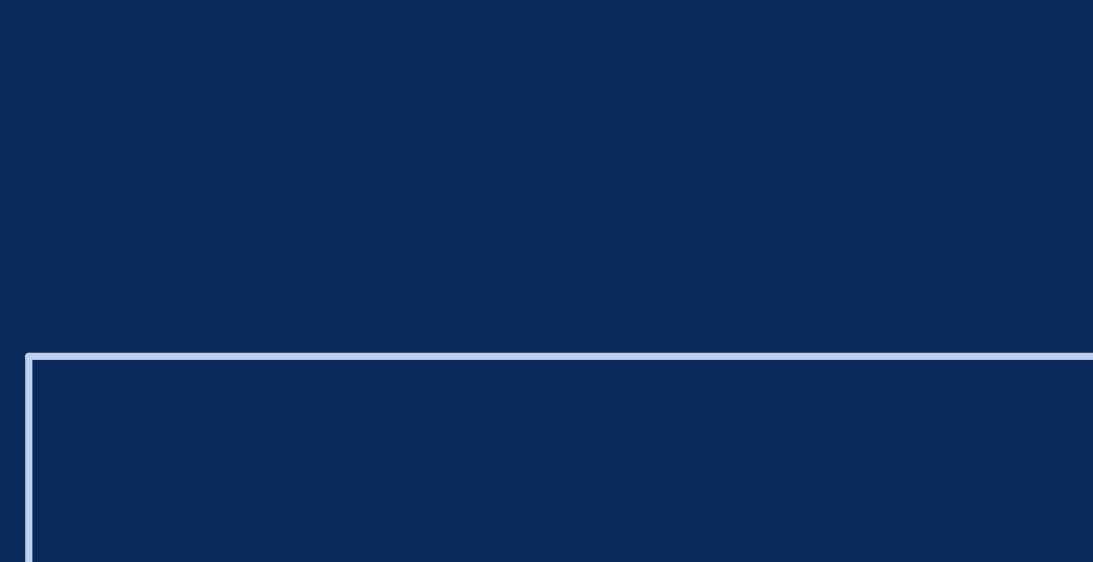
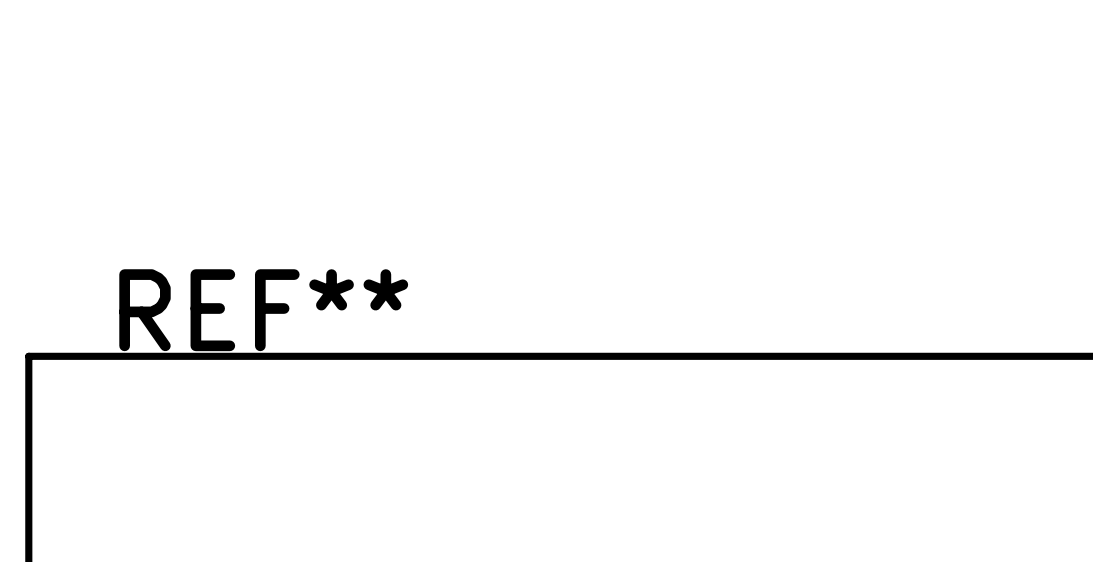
REF**: none -> (263, 310)

